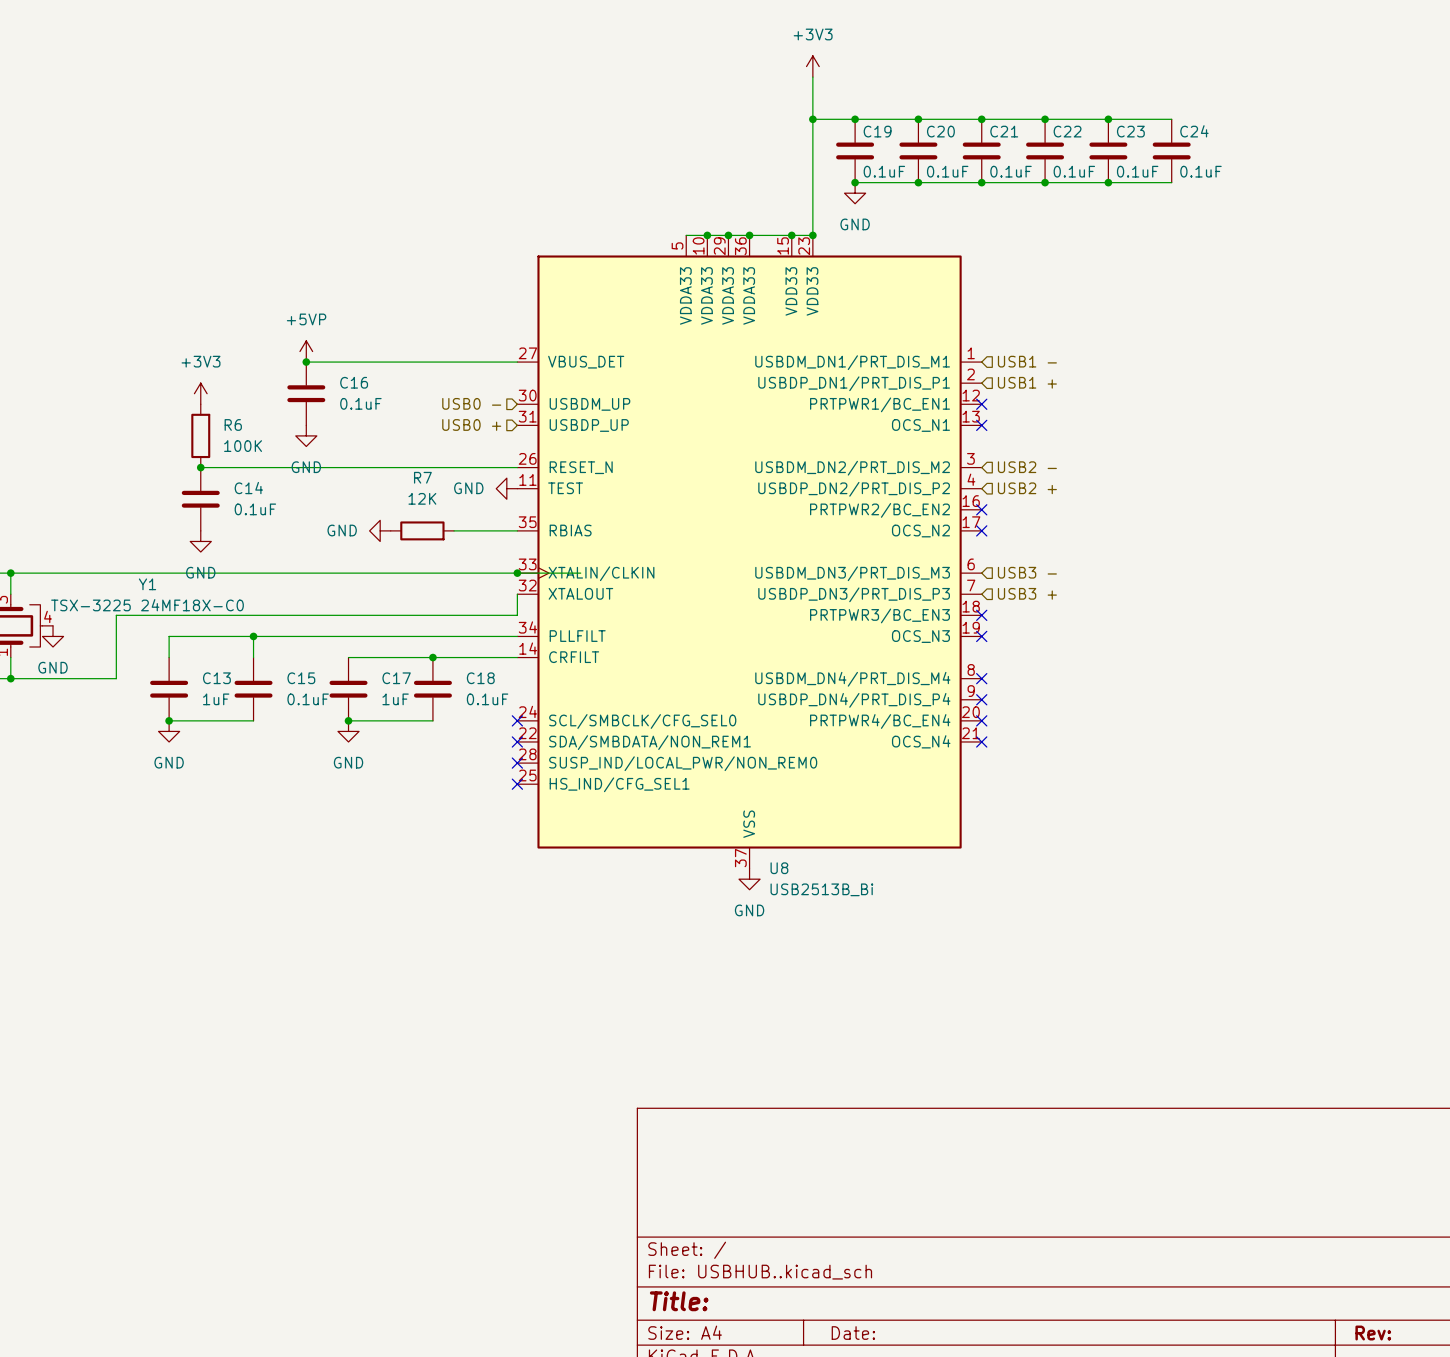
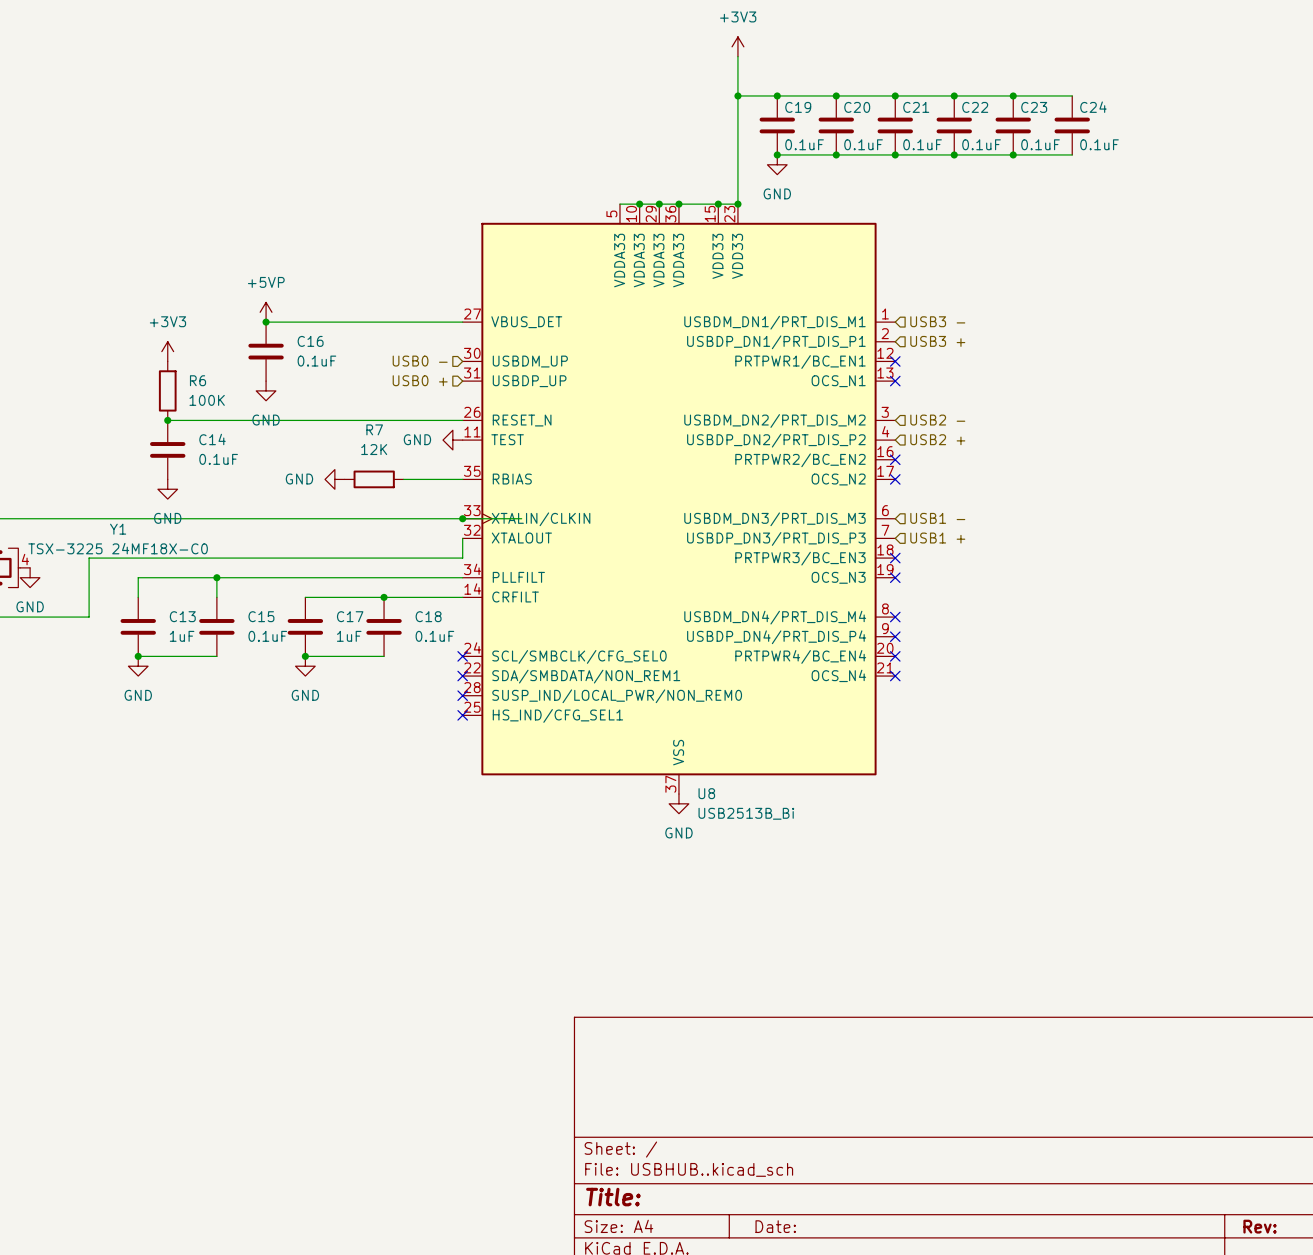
hierarchical label: USB1 - (1027, 361) -> USB3 - (937, 321)
hierarchical label: USB1 + (1027, 382) -> USB3 + (937, 341)
hierarchical label: USB3 - (1027, 572) -> USB1 - (937, 518)
hierarchical label: USB3 + (1027, 593) -> USB1 + (937, 538)

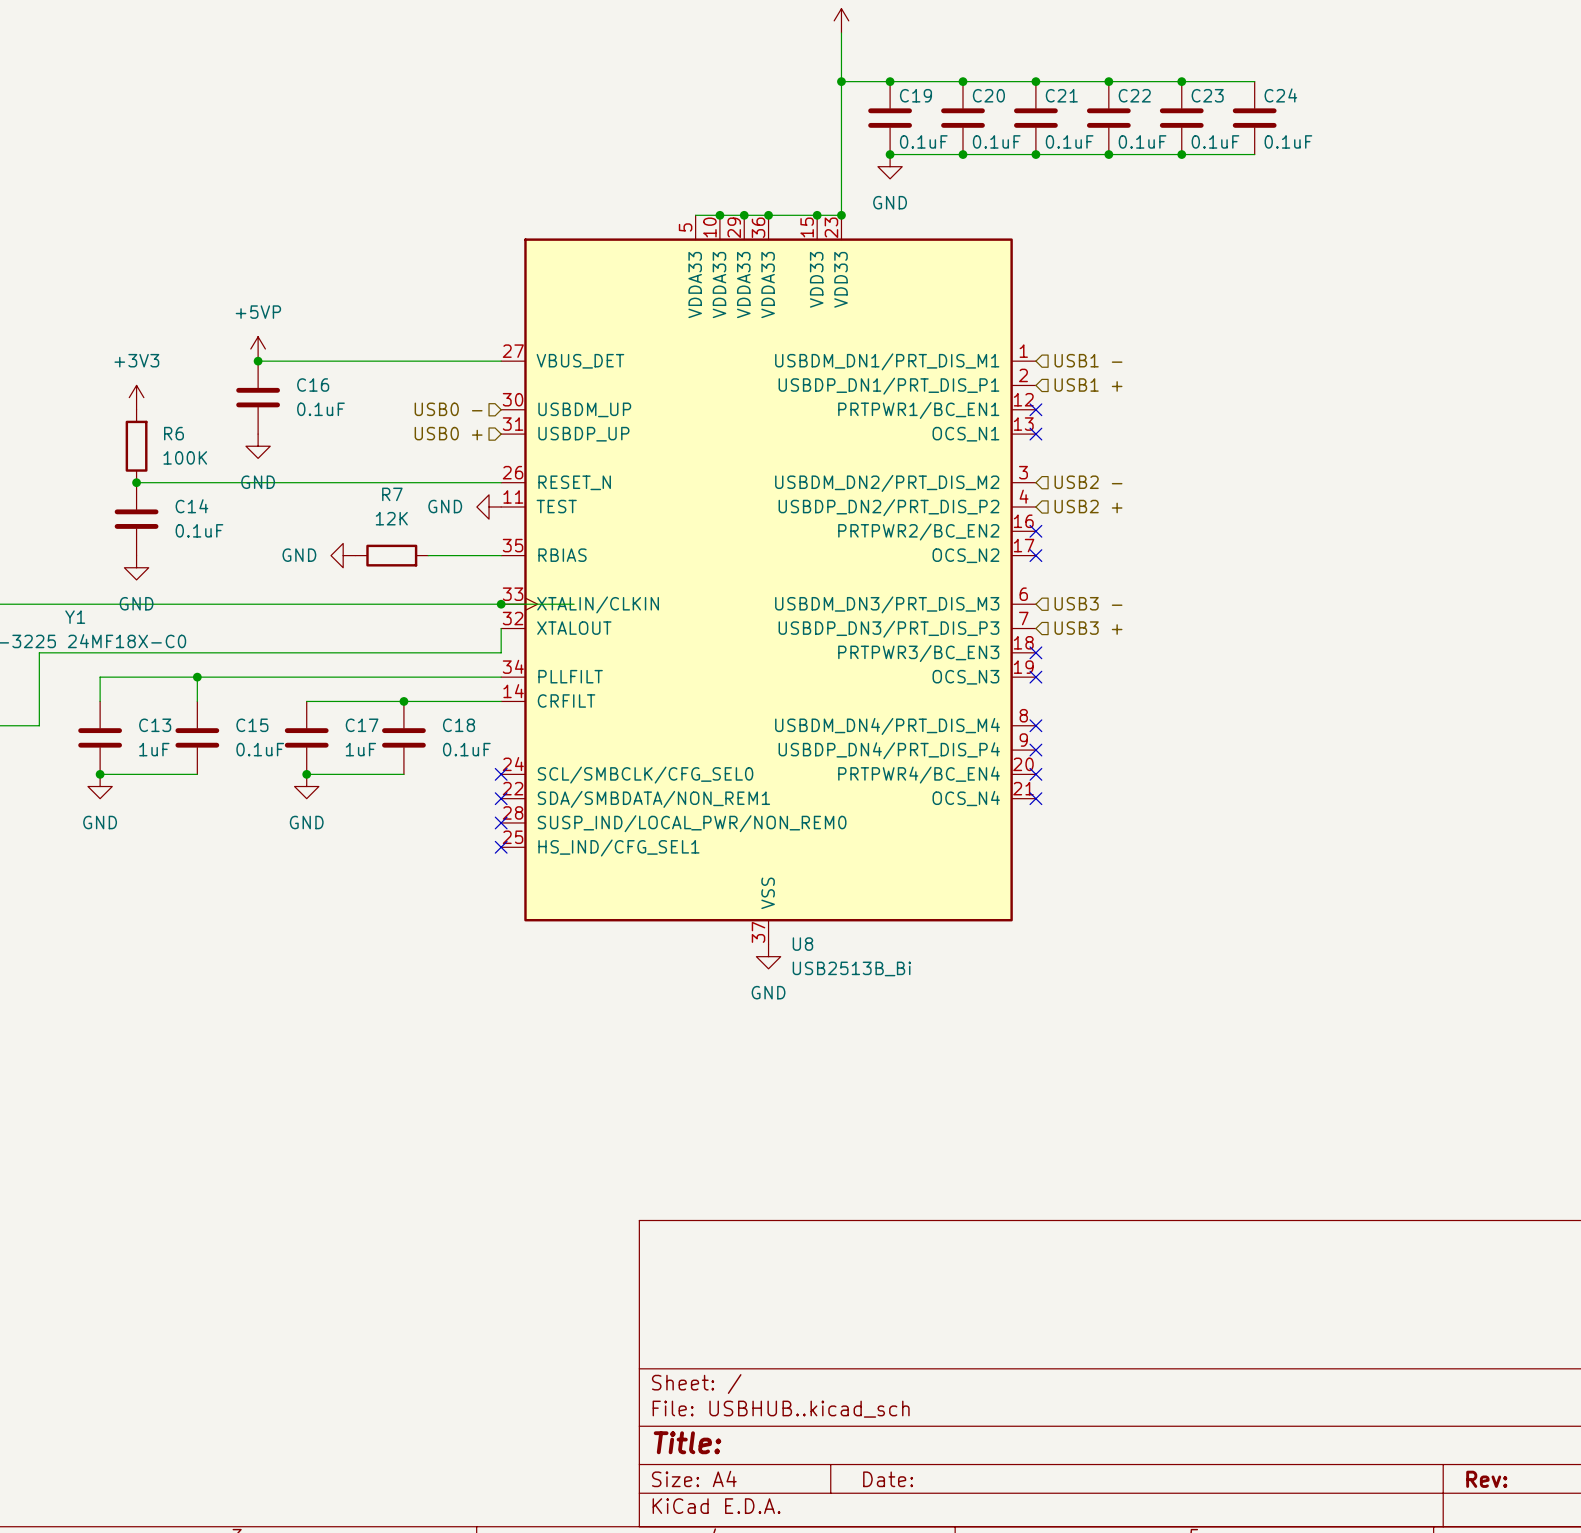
hierarchical label: USB3 - (937, 321) -> USB1 - (1088, 360)
hierarchical label: USB3 + (937, 341) -> USB1 + (1088, 385)
hierarchical label: USB1 - (937, 518) -> USB3 - (1088, 603)
hierarchical label: USB1 + (937, 538) -> USB3 + (1088, 628)

